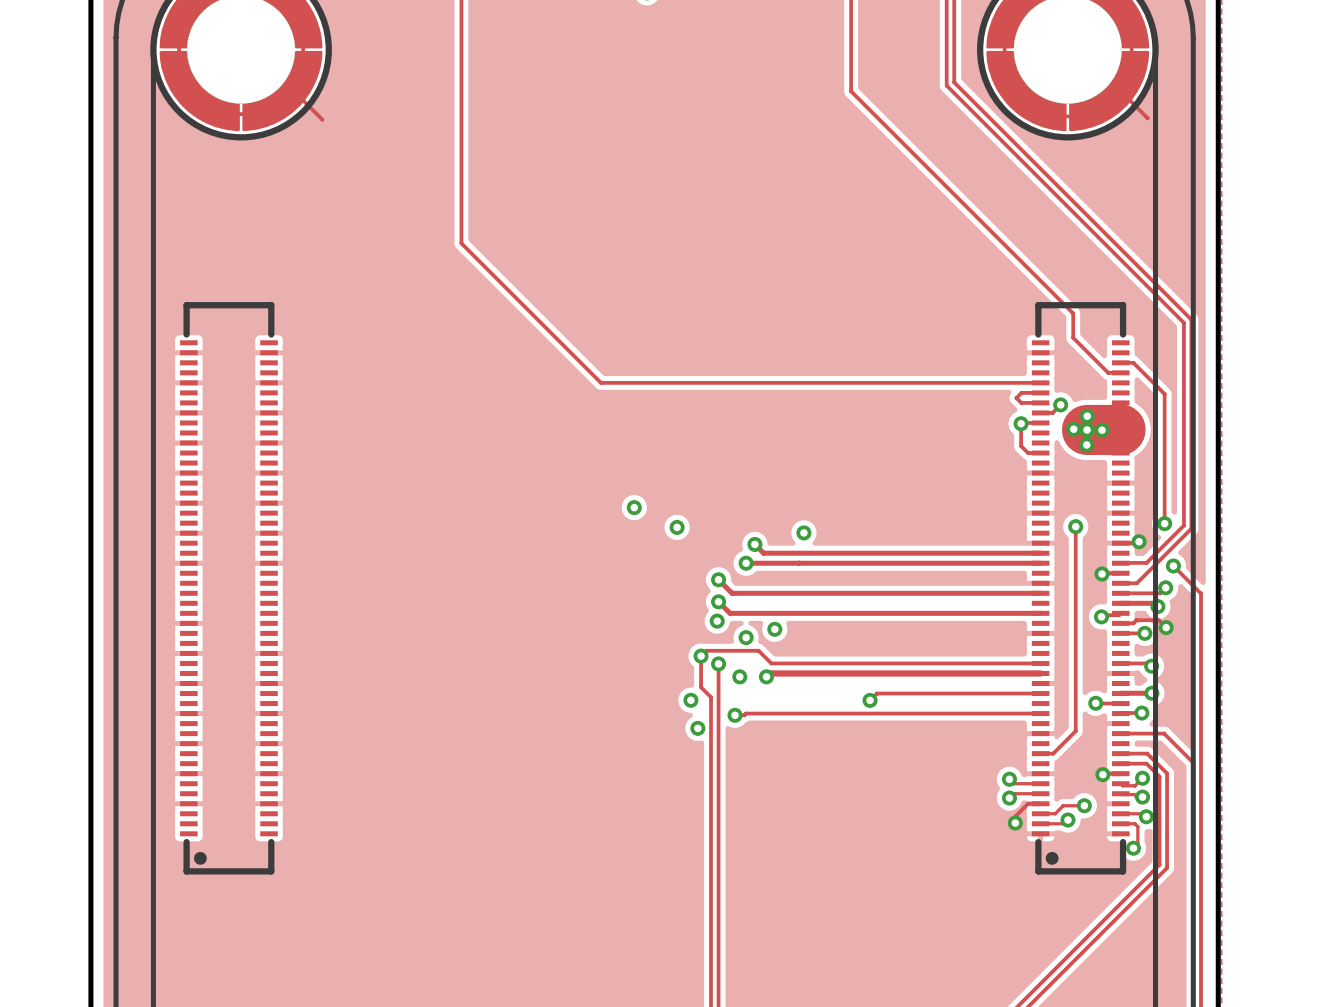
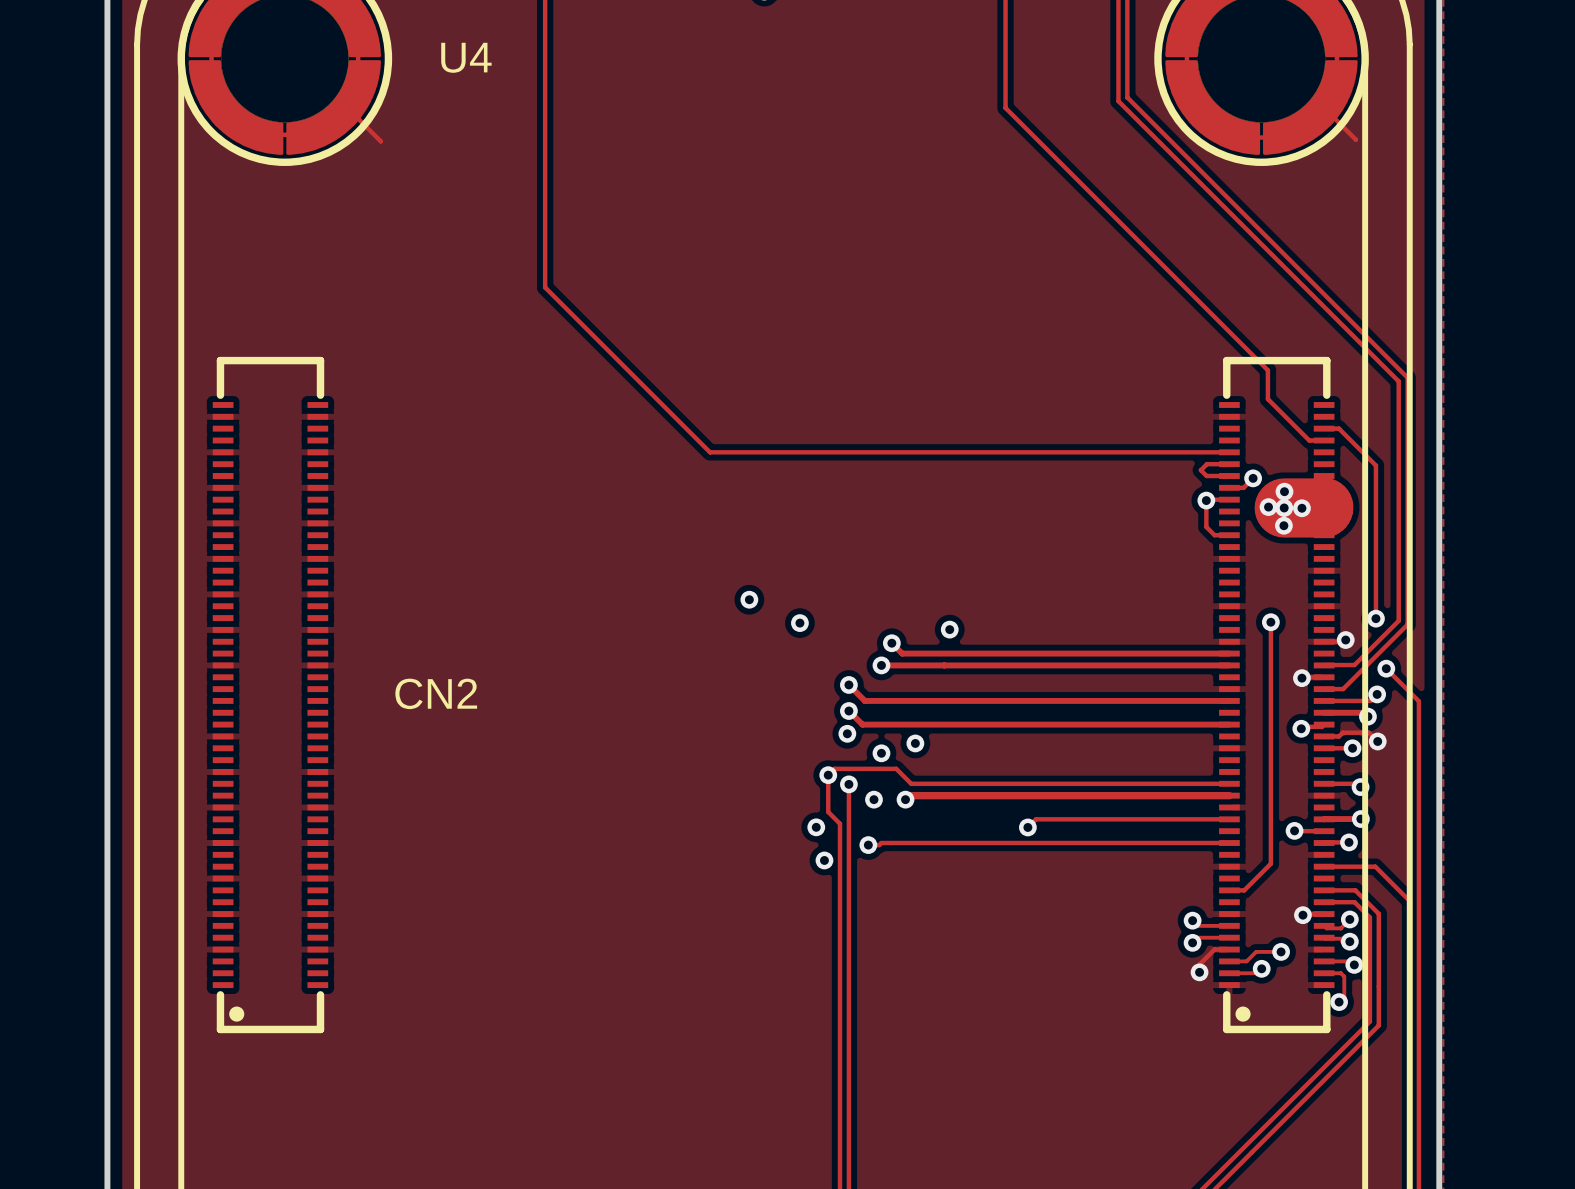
U4 name: none -> U4 (466, 57)
CN2 name: none -> CN2 (436, 693)

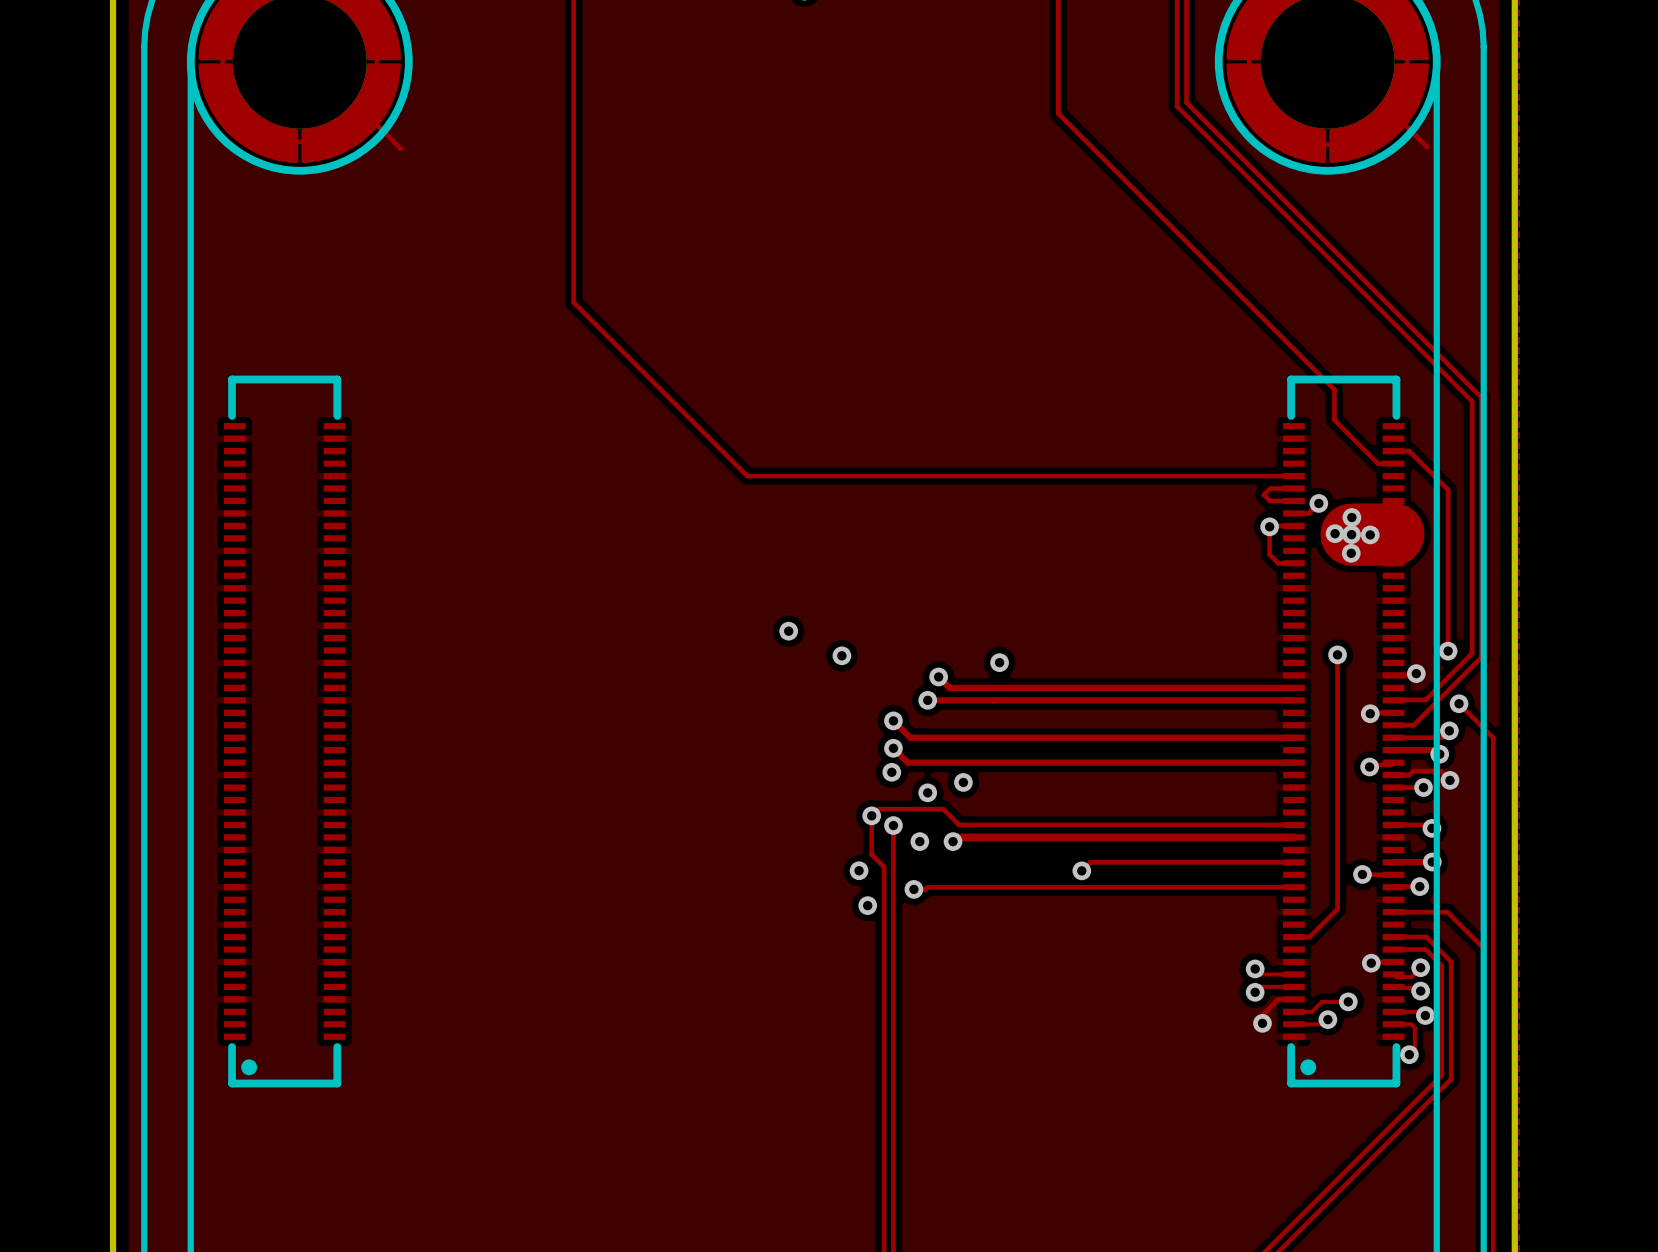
U4 name: U4 (466, 57) -> none
CN2 name: CN2 (436, 693) -> none

